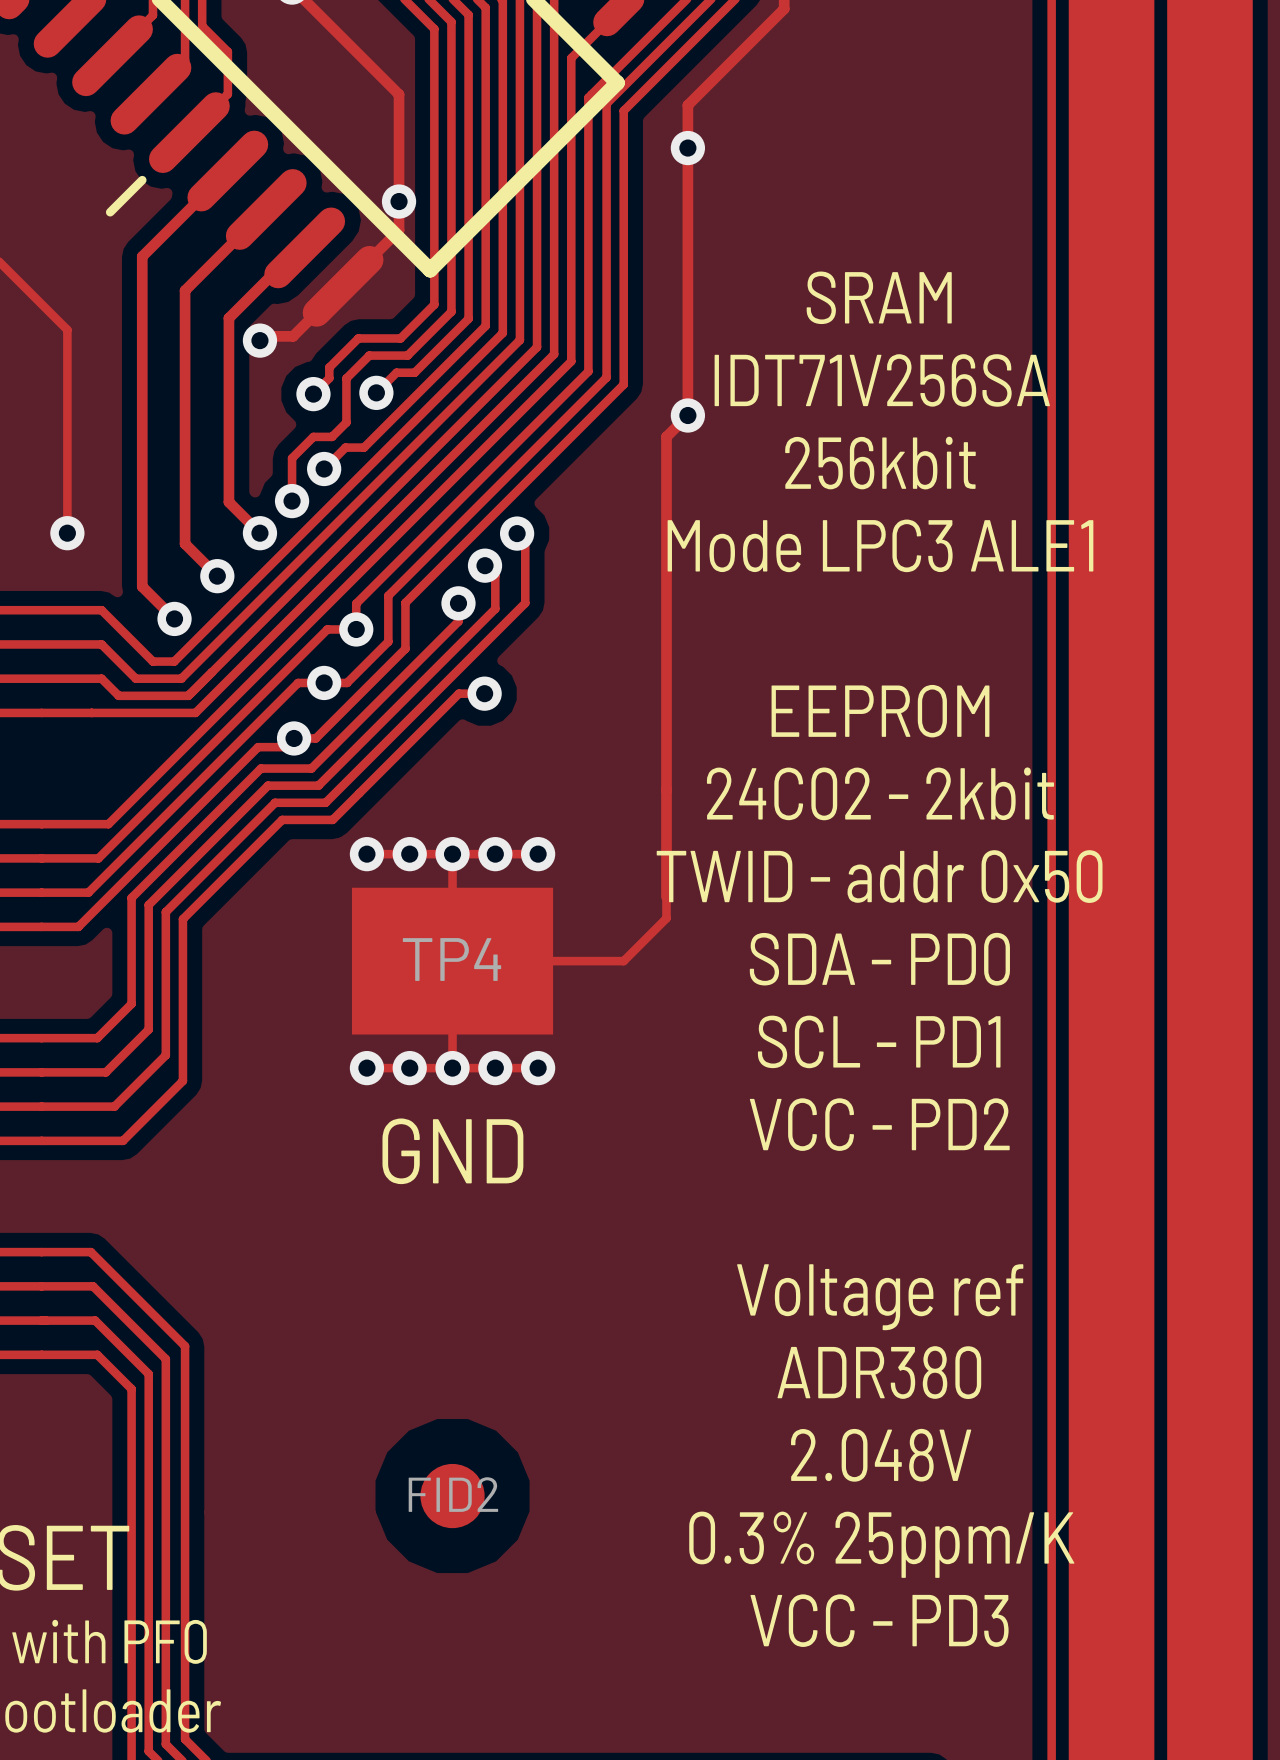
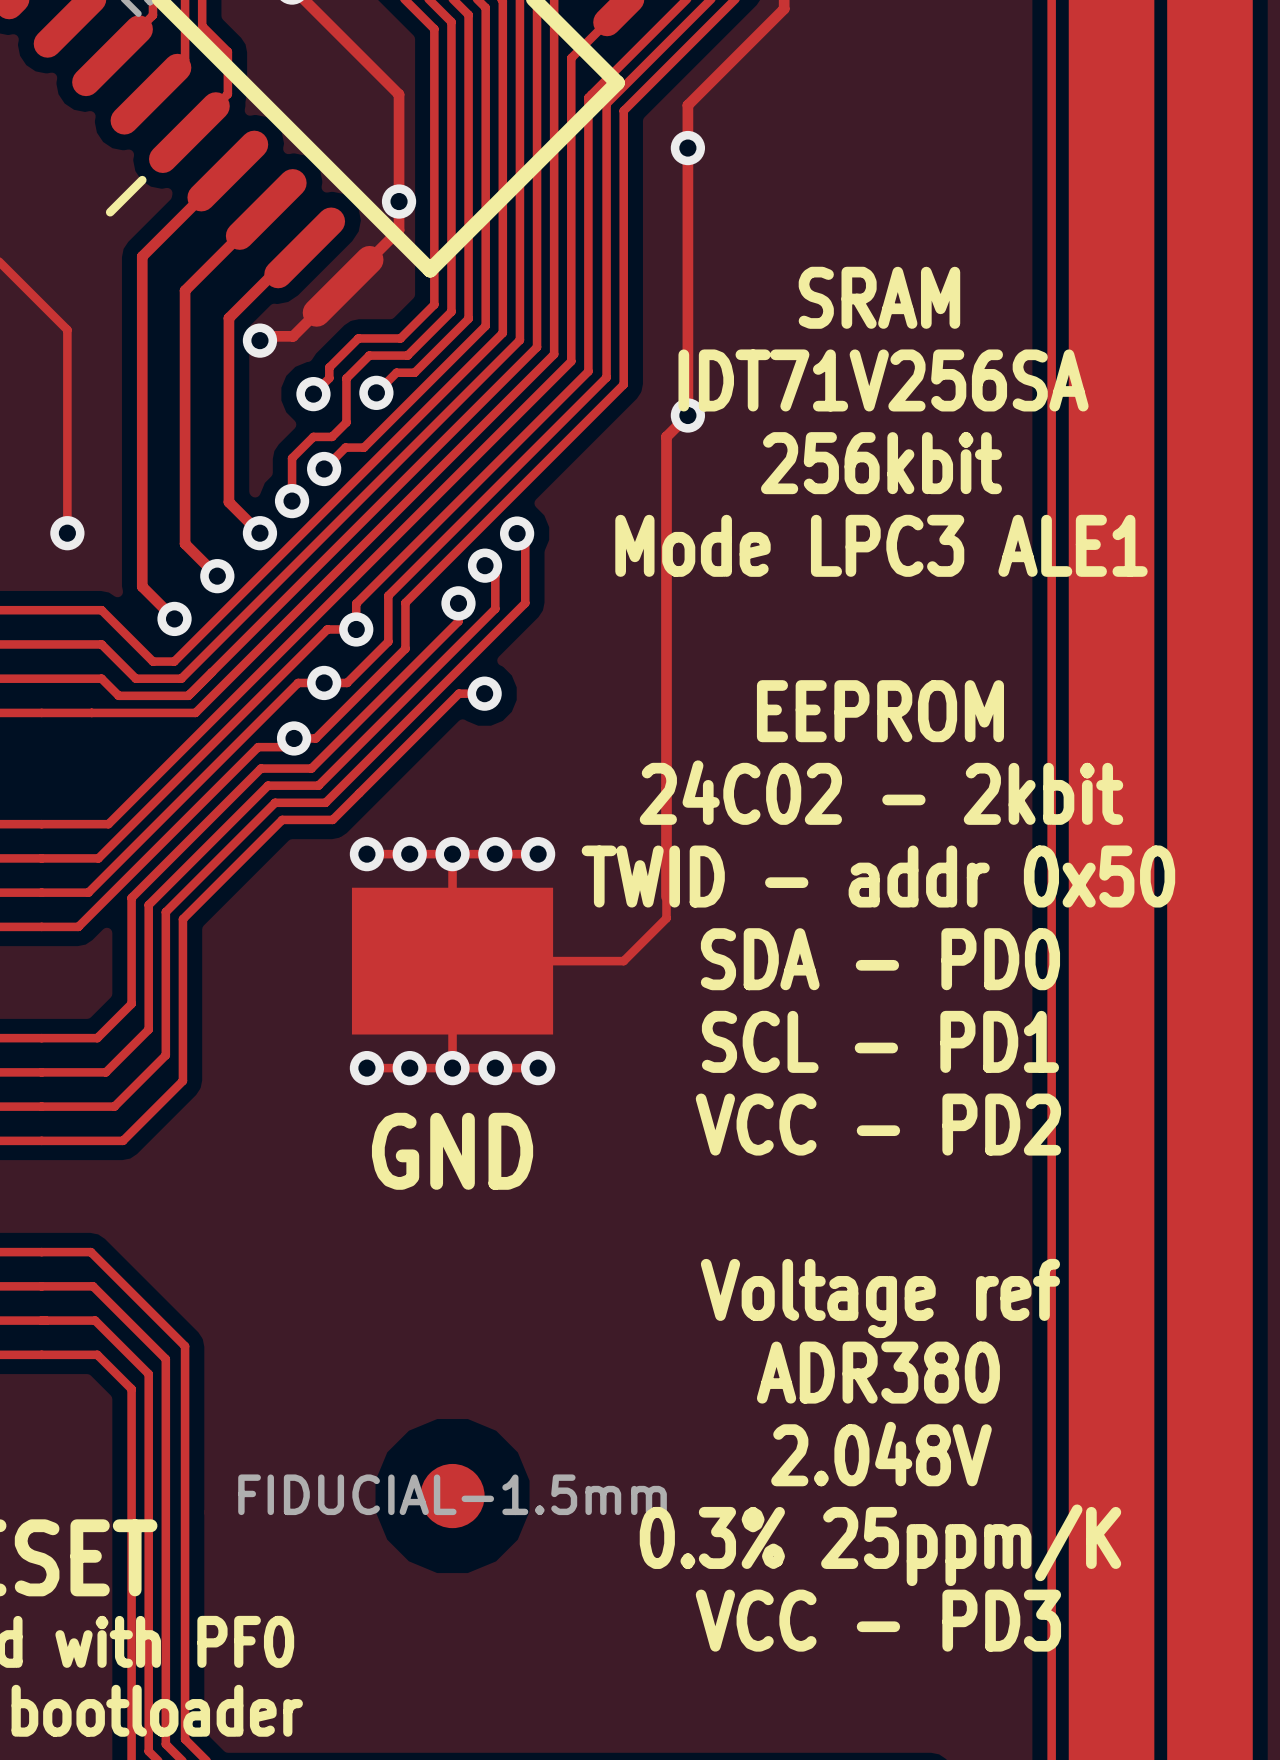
TP4 name: TP4 (451, 959) -> none
FID2 name: FID2 (453, 1494) -> none
FID2 value: none -> FIDUCIAL-1.5mm (452, 1494)

